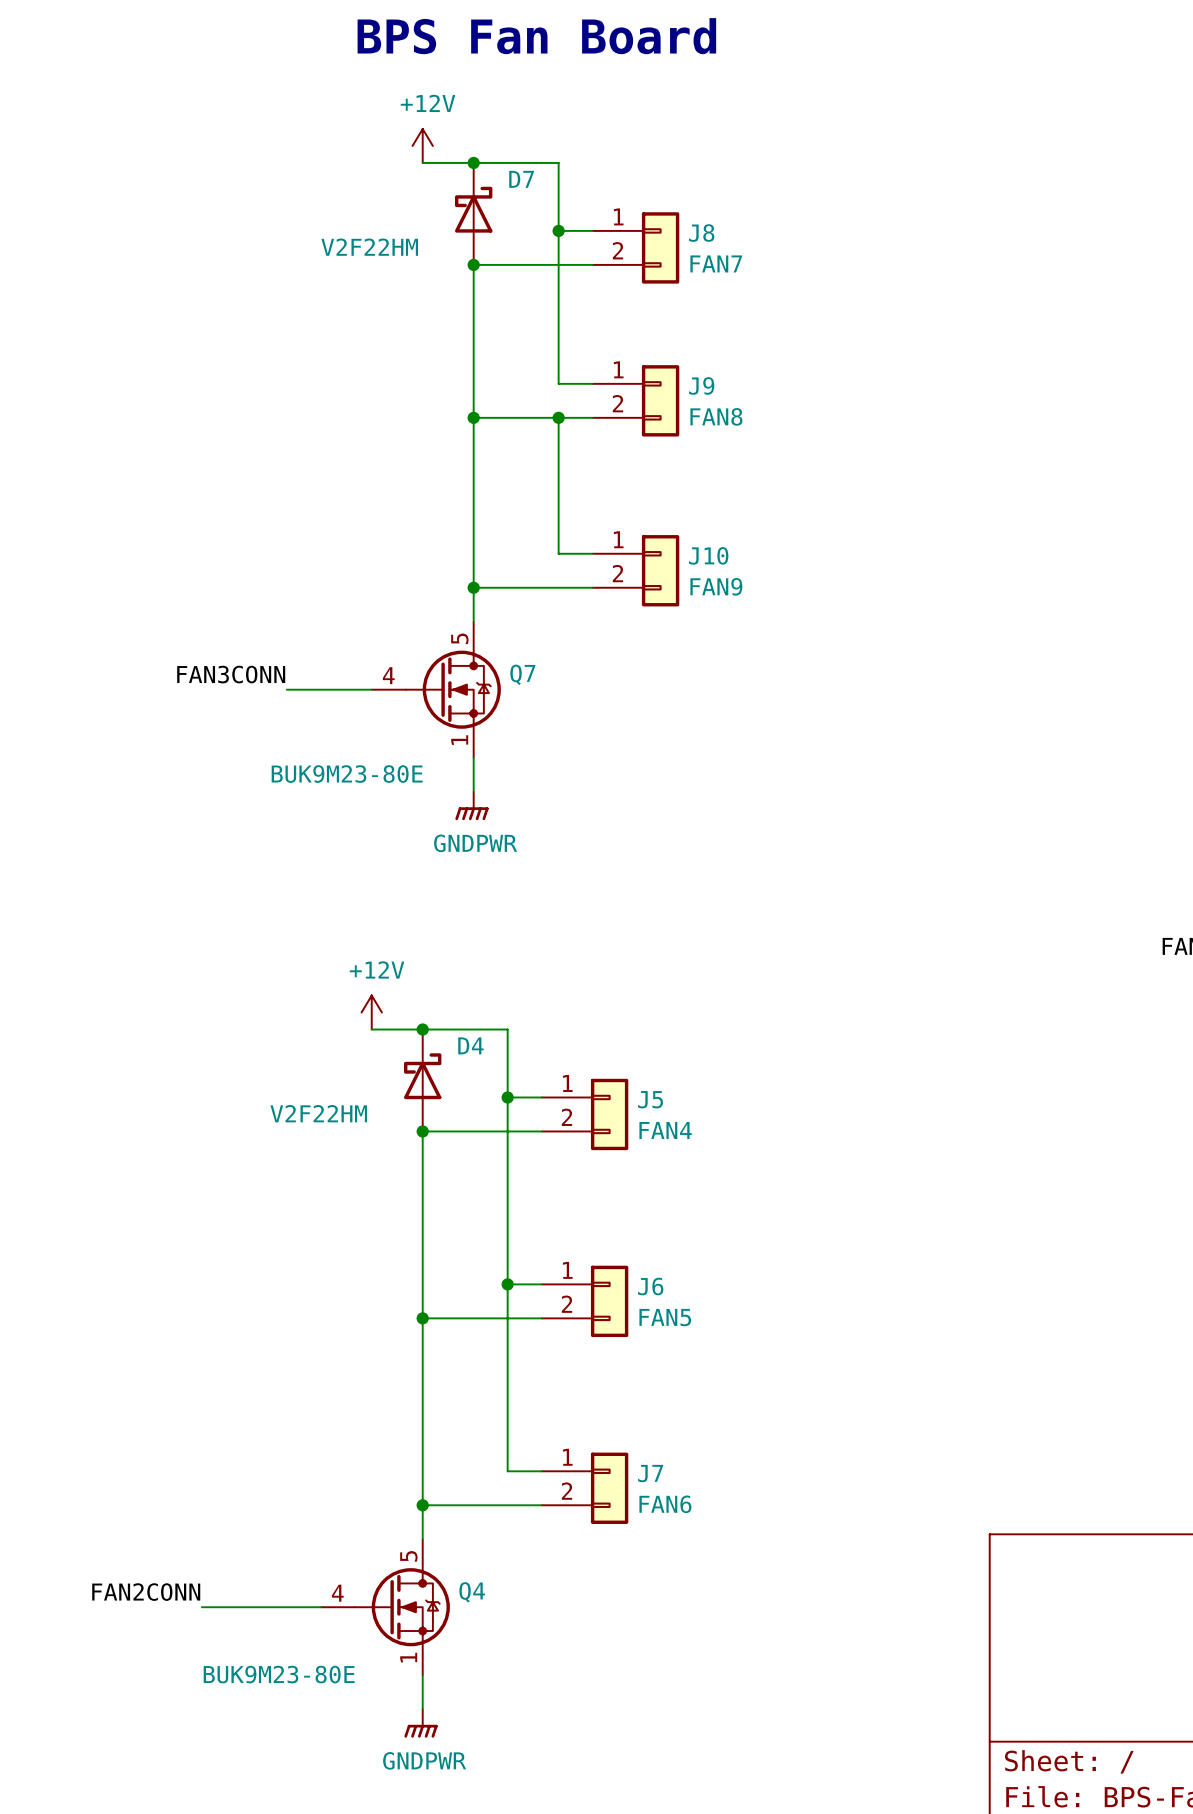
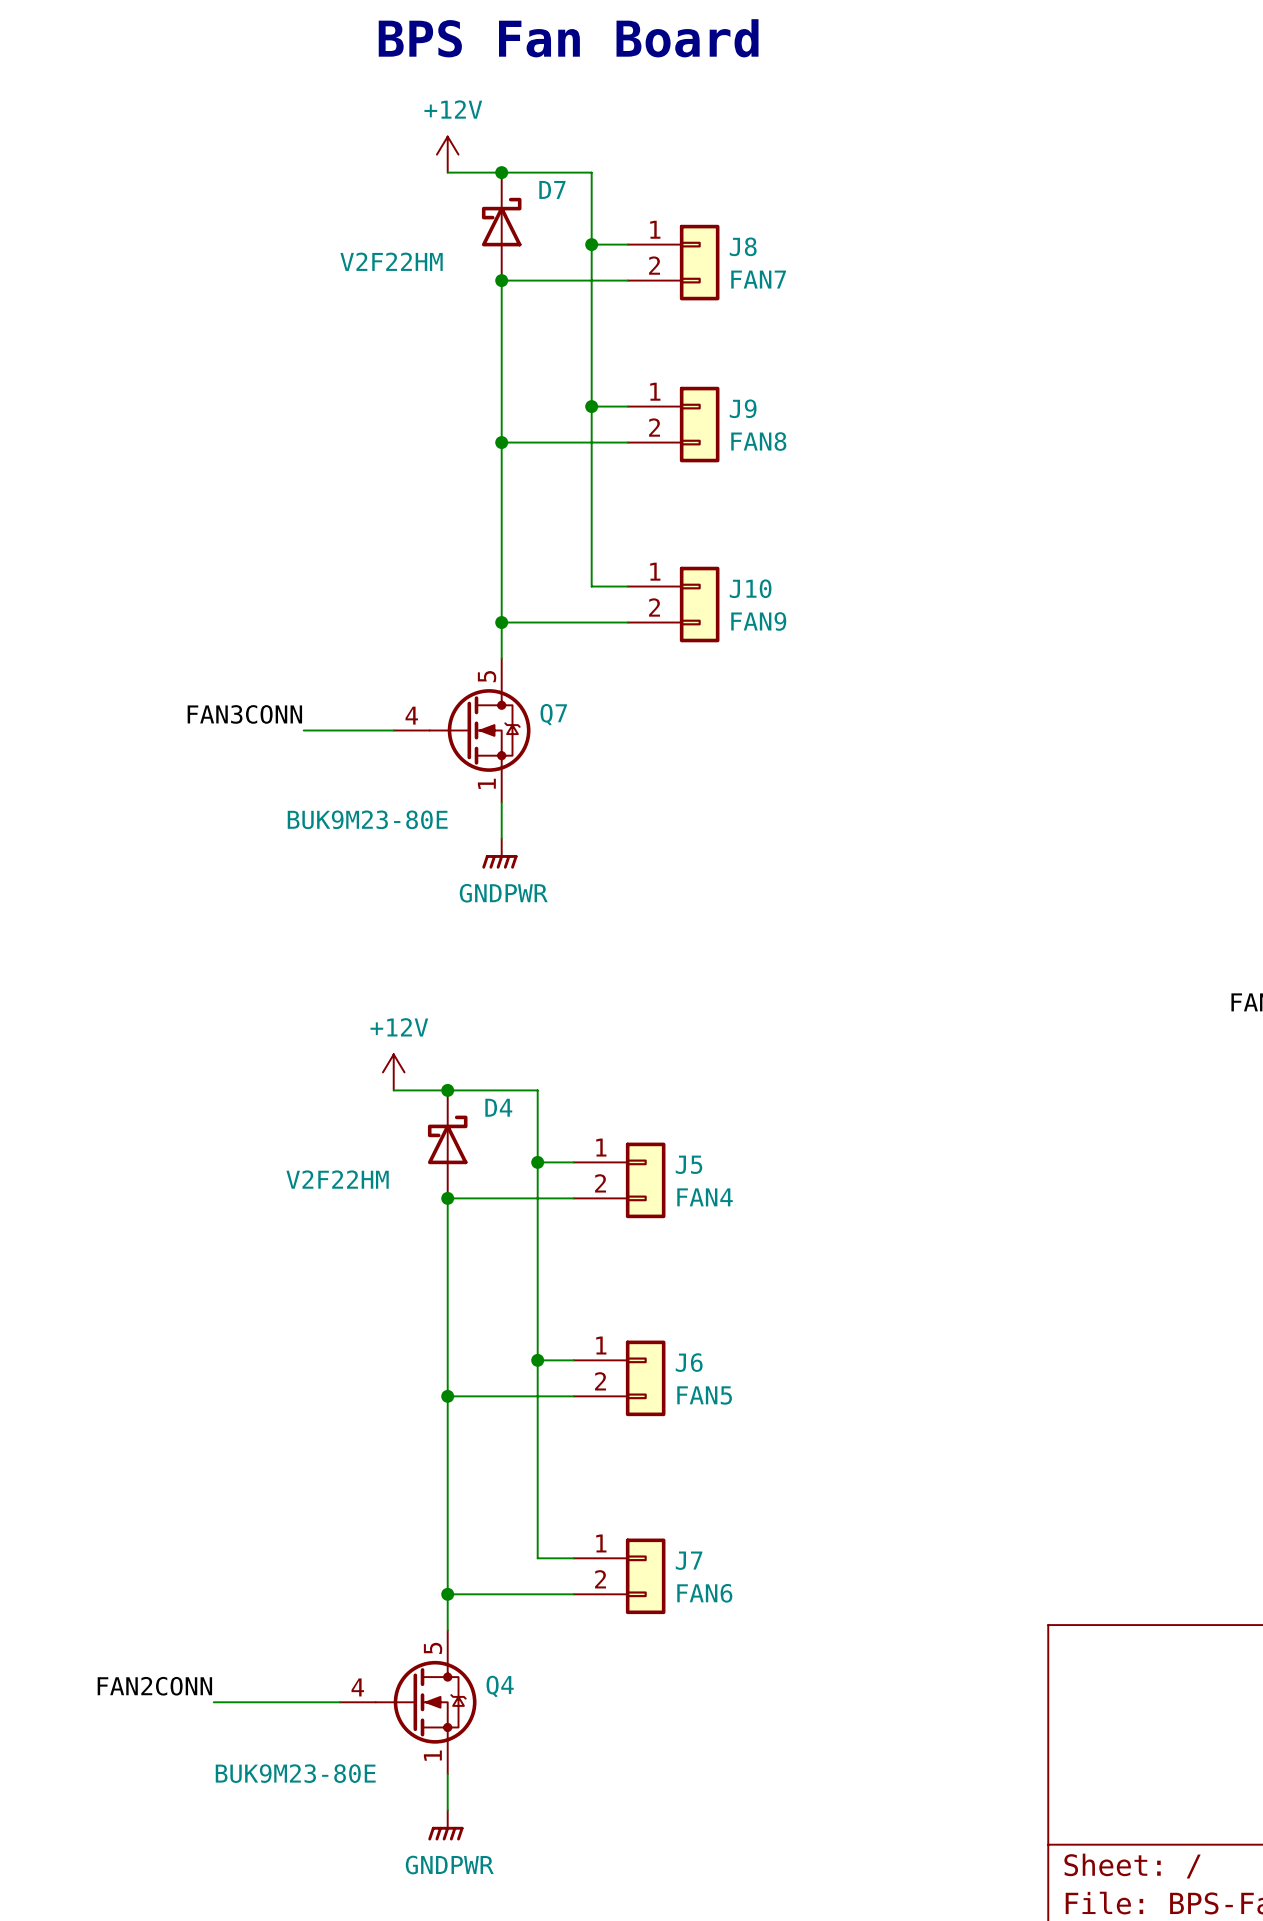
wire: none -> (591, 406) (591, 442)
junction position: (558, 417) -> (591, 406)

